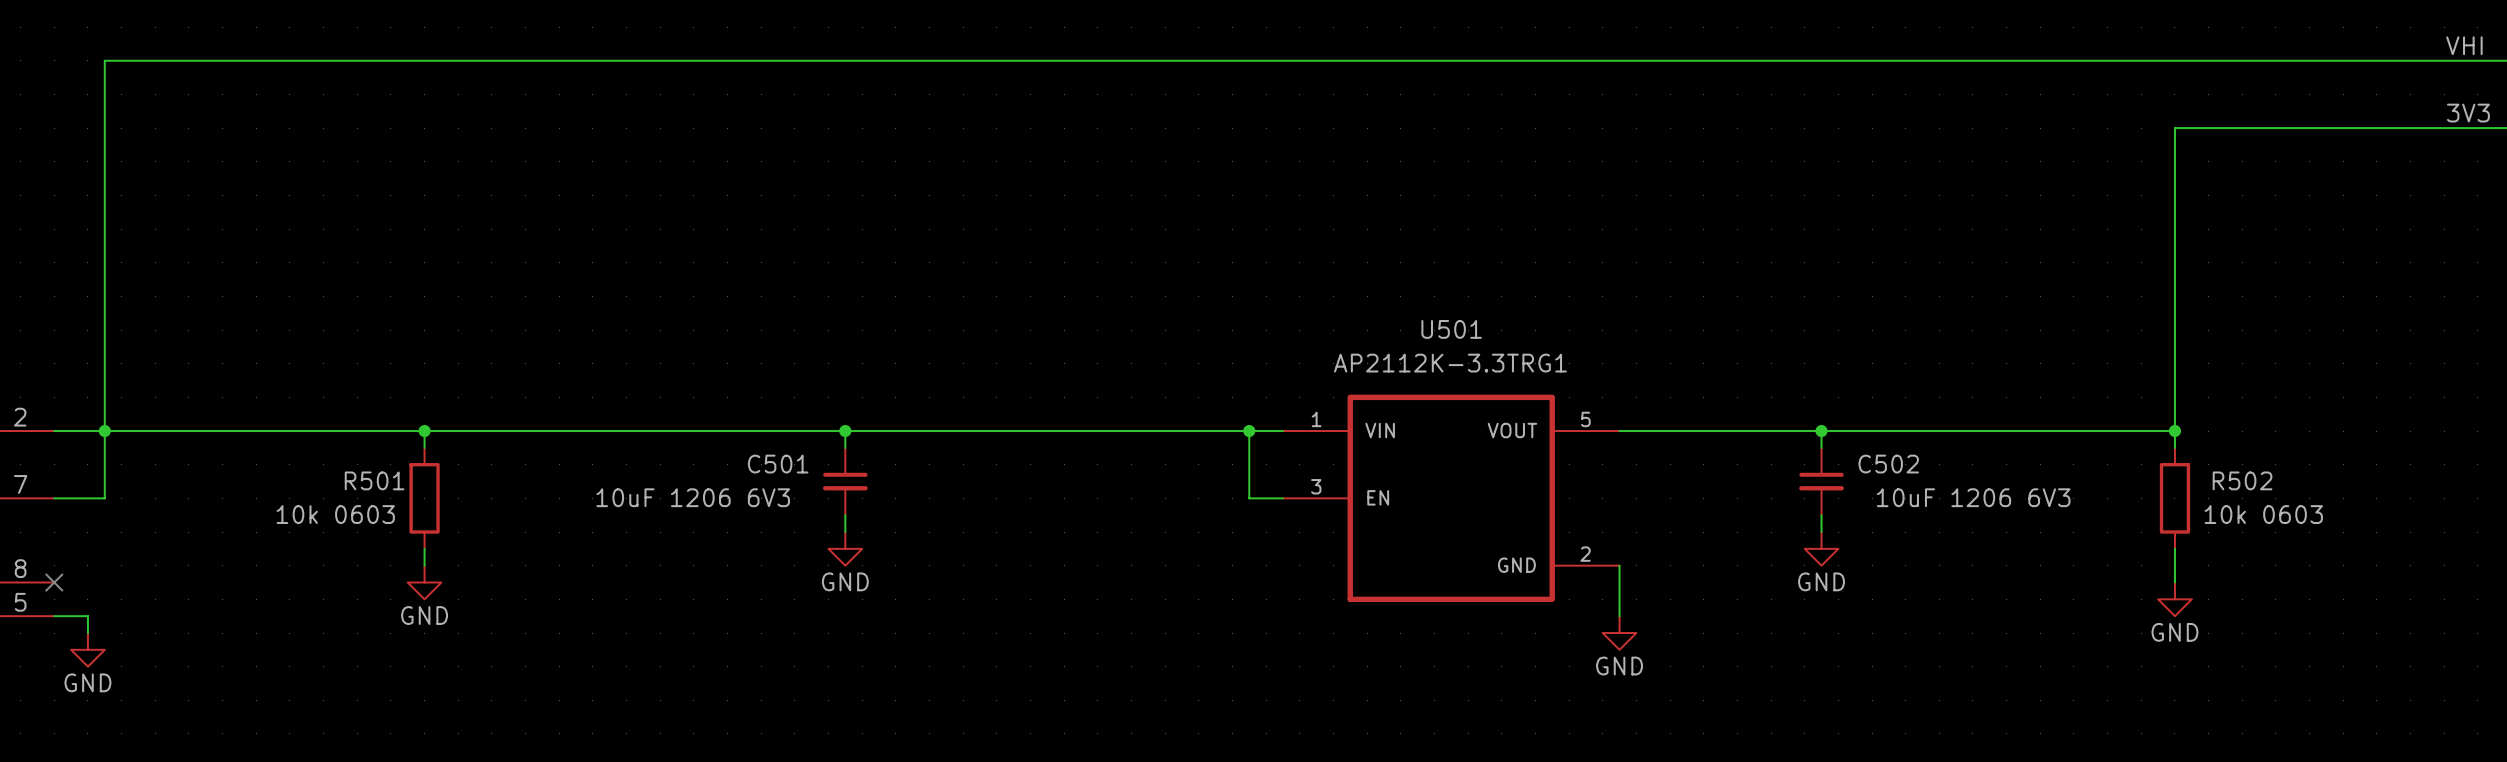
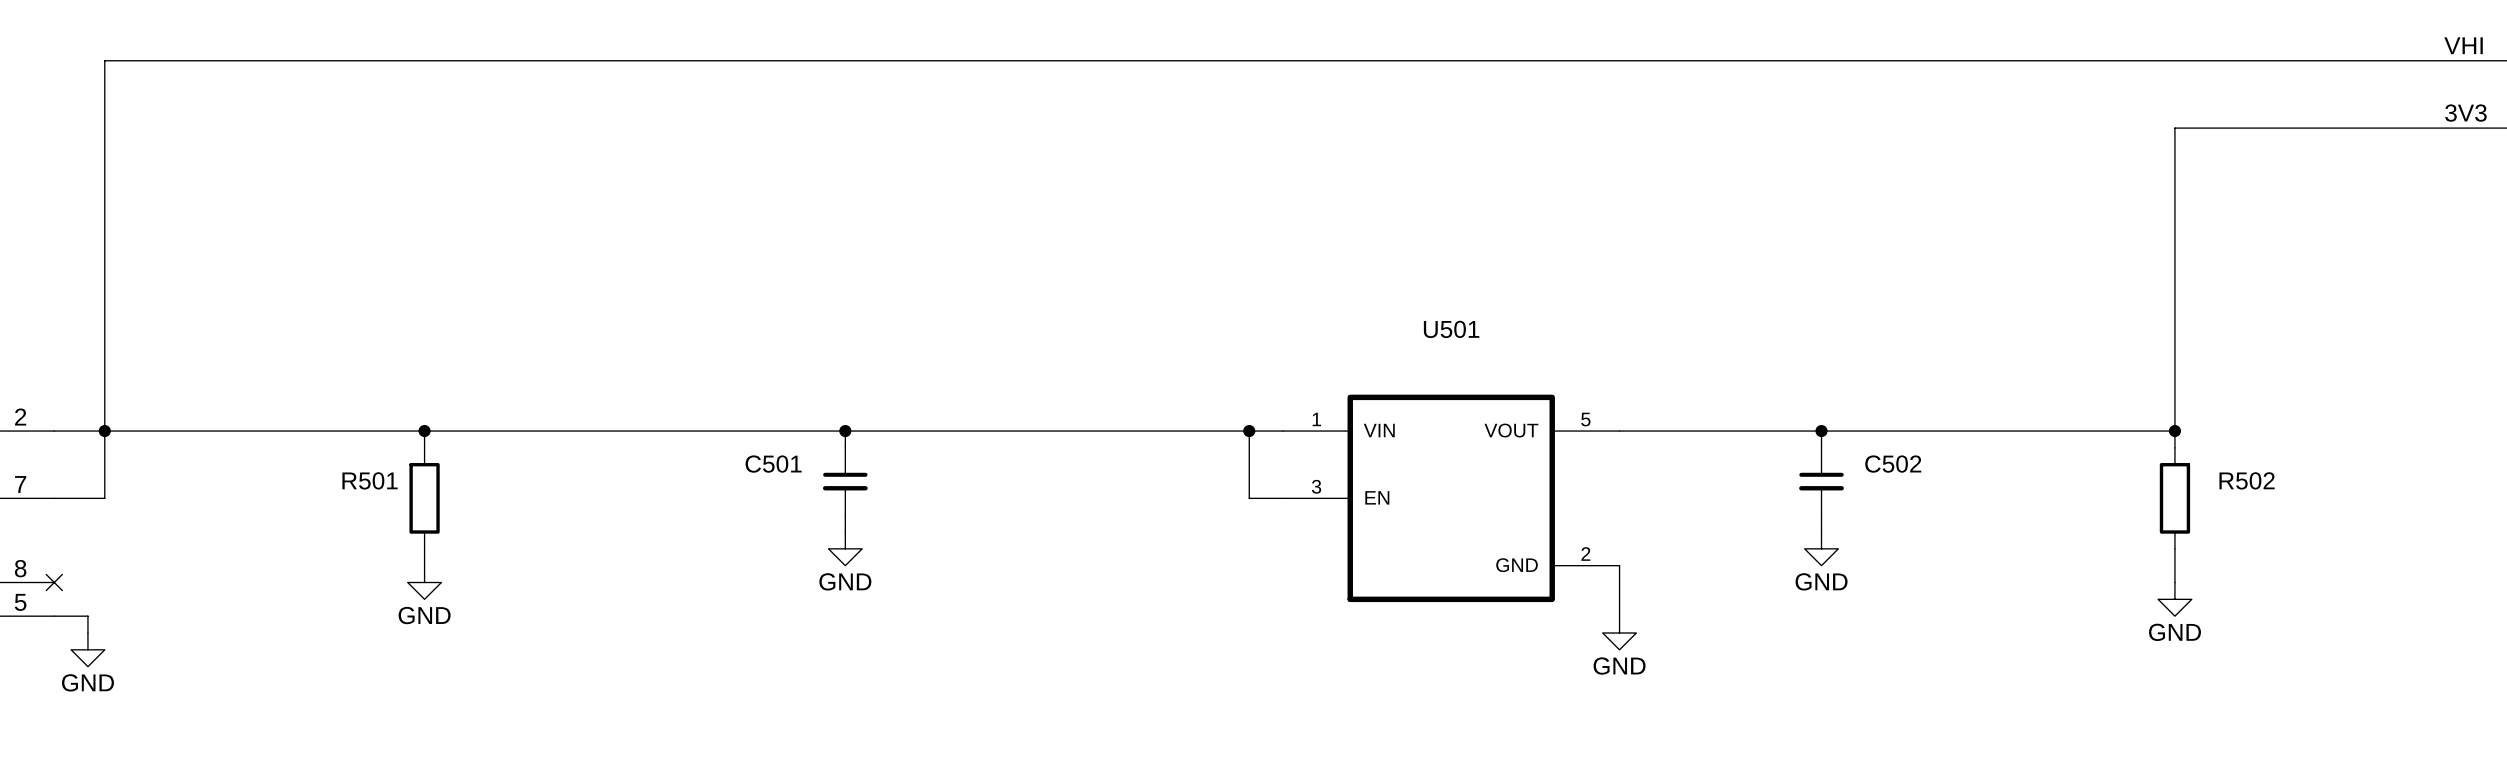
U501 value: AP2112K-3.3TRG1 (1450, 363) -> none
C501 value: 10uF 1206 6V3 (693, 497) -> none
C502 value: 10uF 1206 6V3 (1973, 497) -> none
R501 value: 10k 0603 (335, 514) -> none
R502 value: 10k 0603 (2263, 514) -> none

